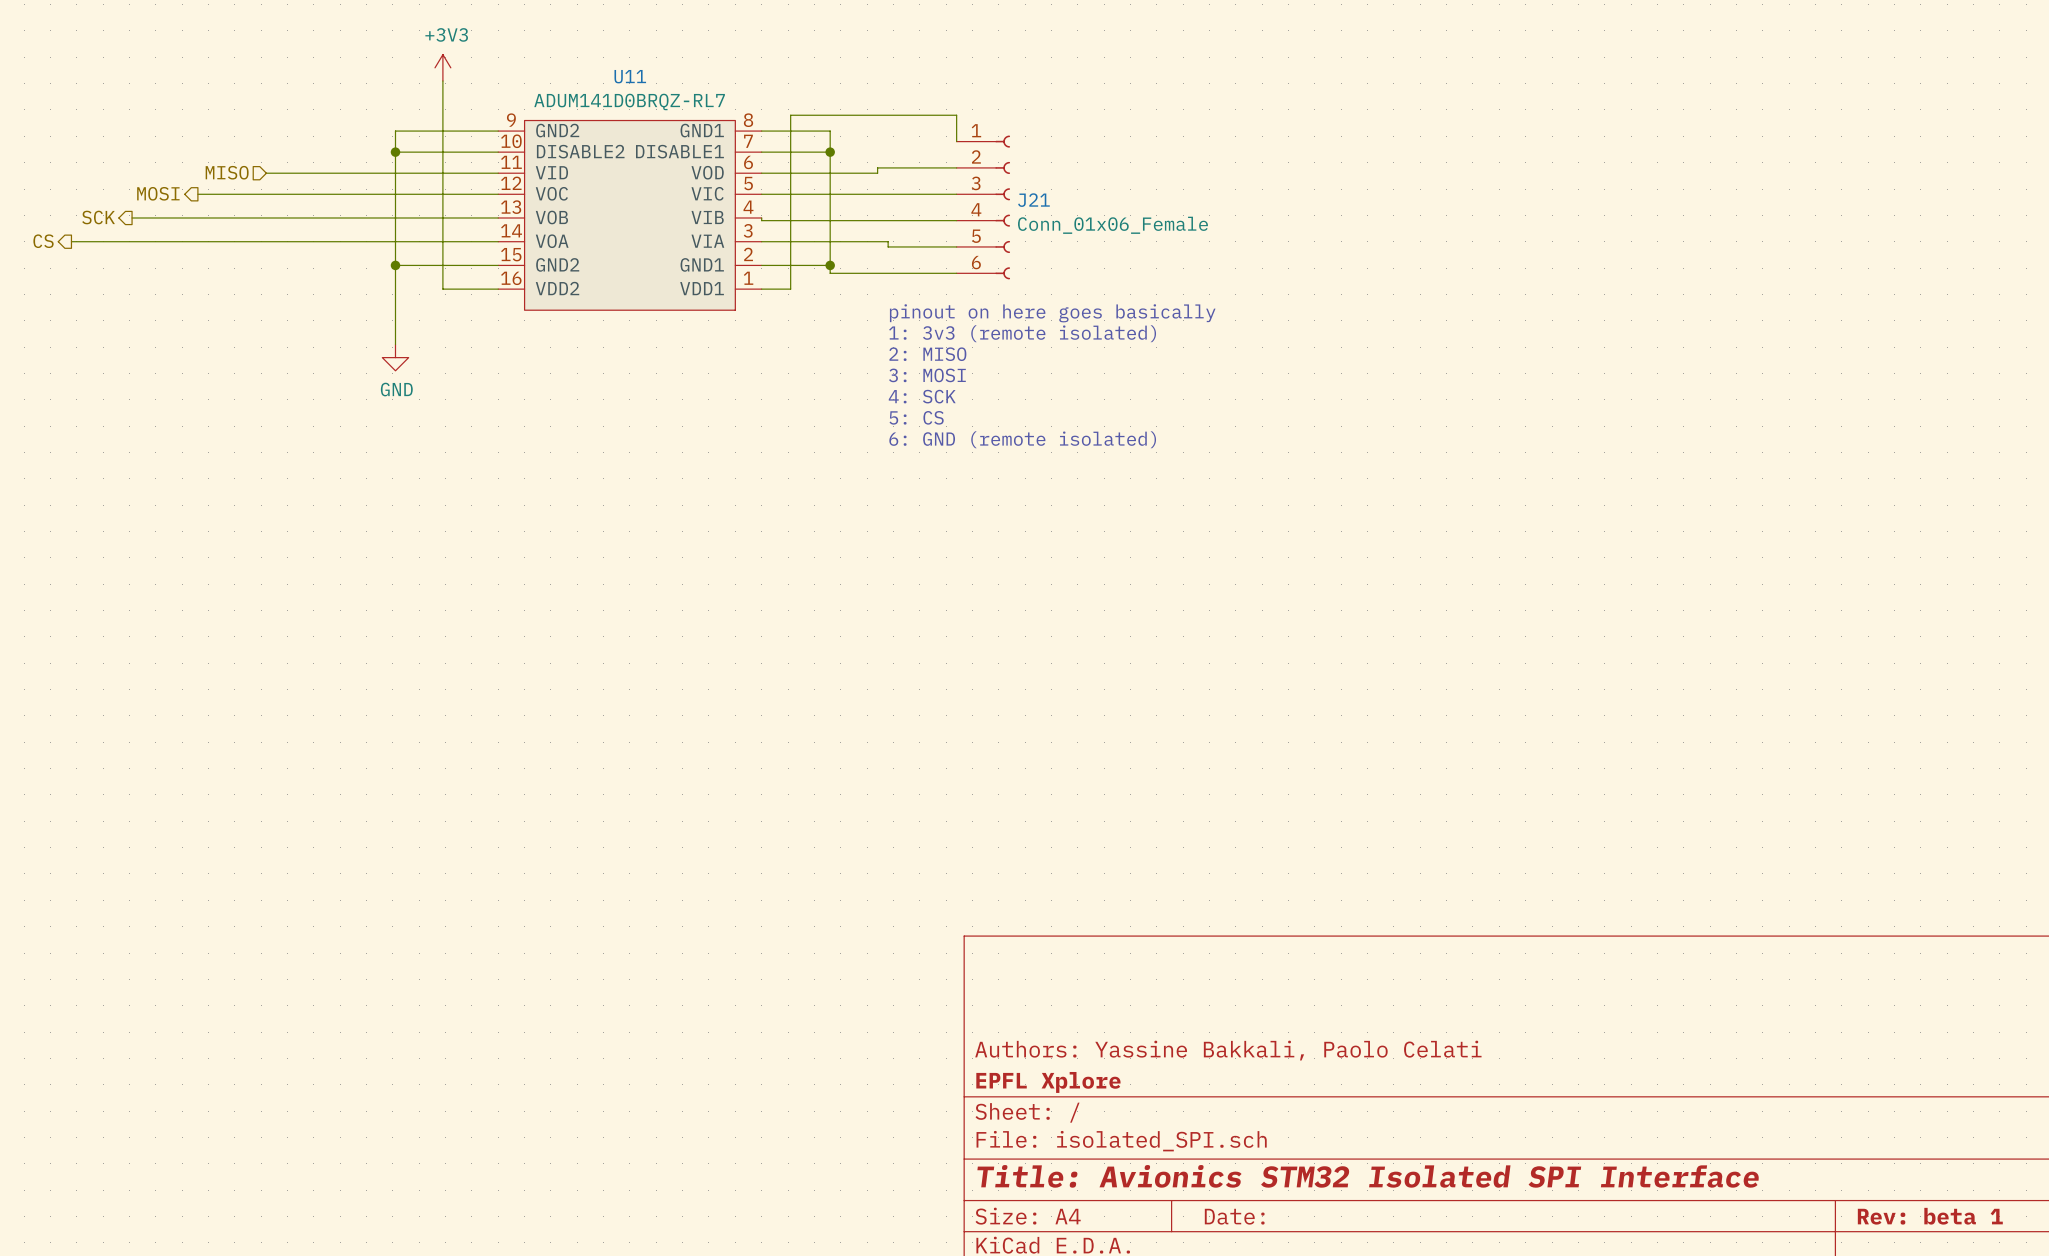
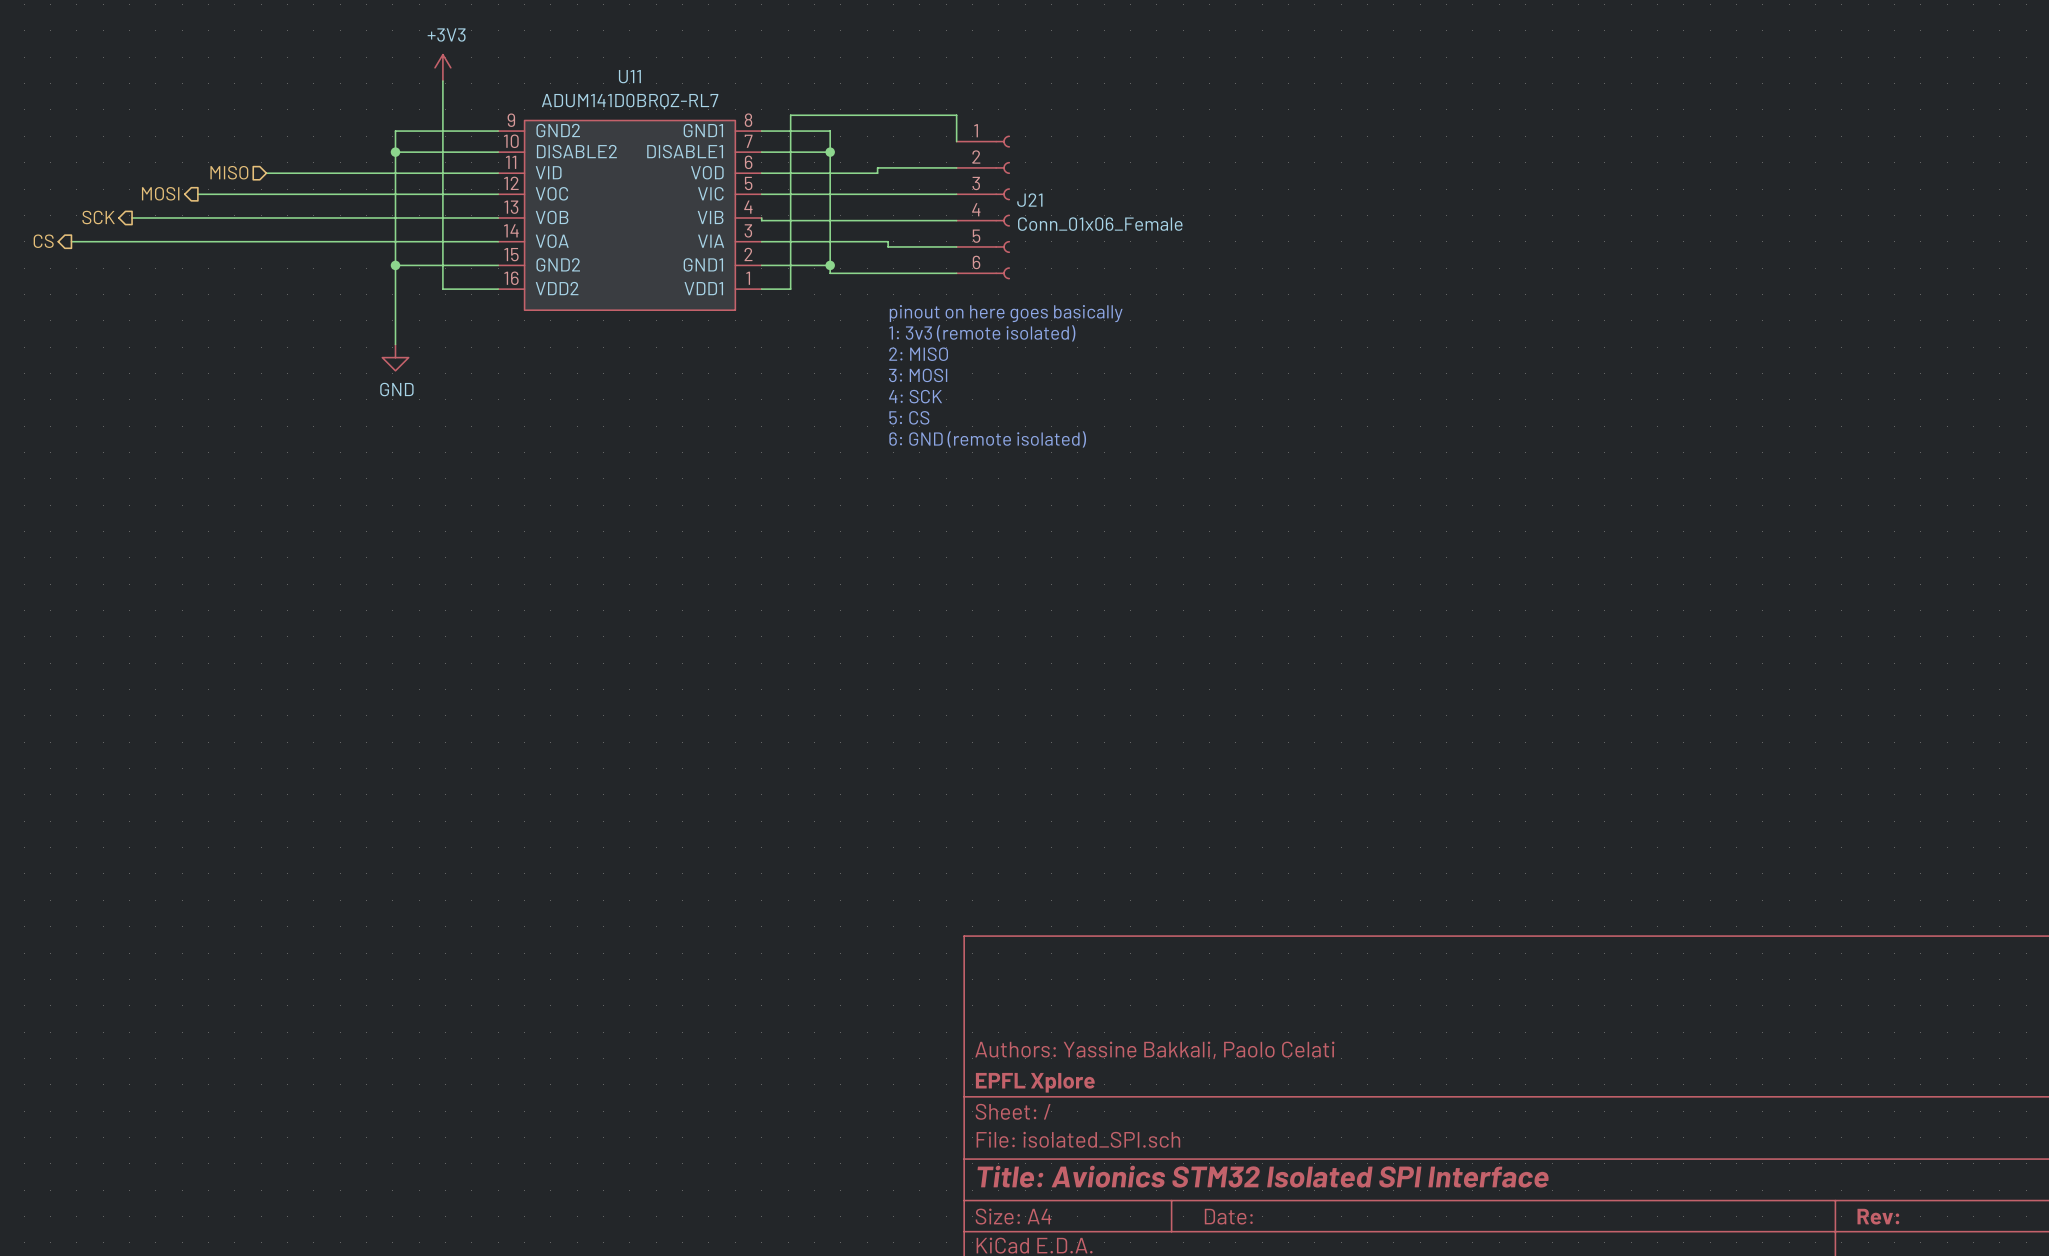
title block: Rev: beta 1 (1930, 1216) -> Rev: (1878, 1216)

